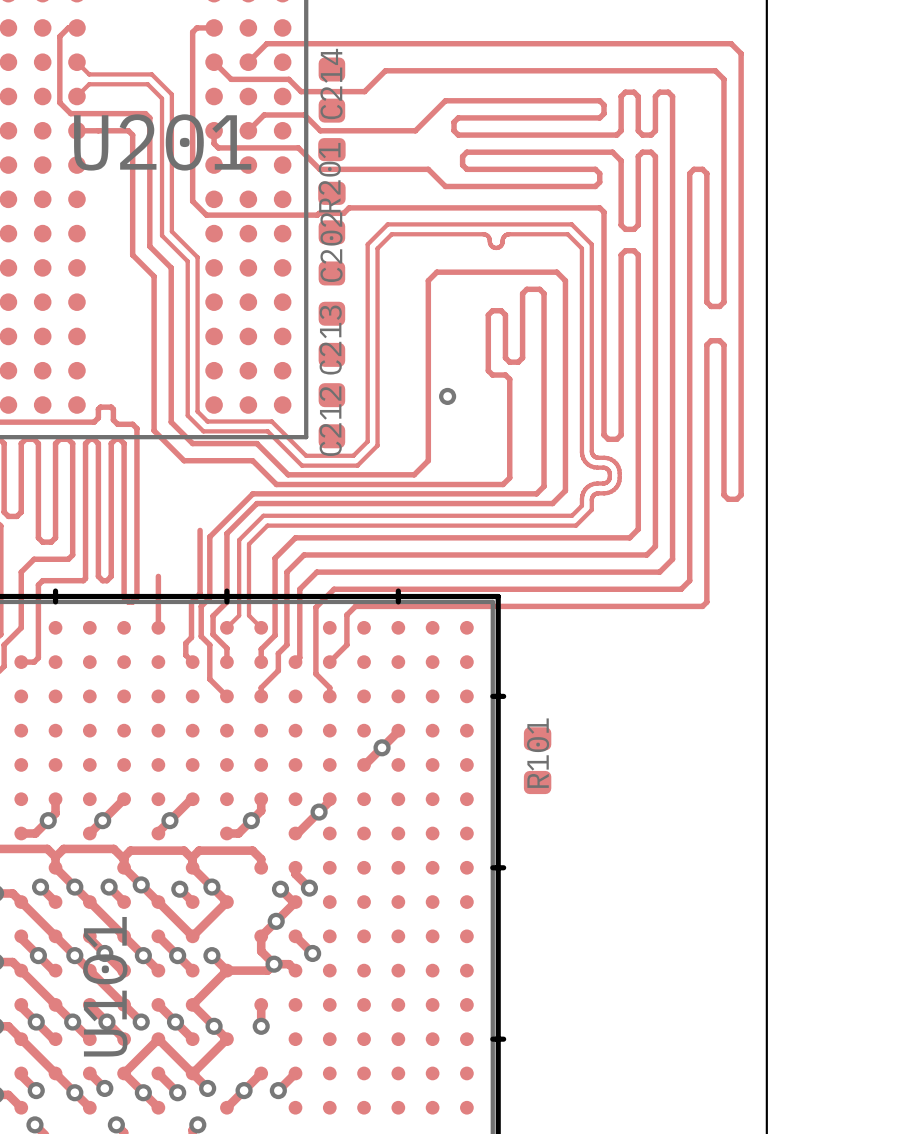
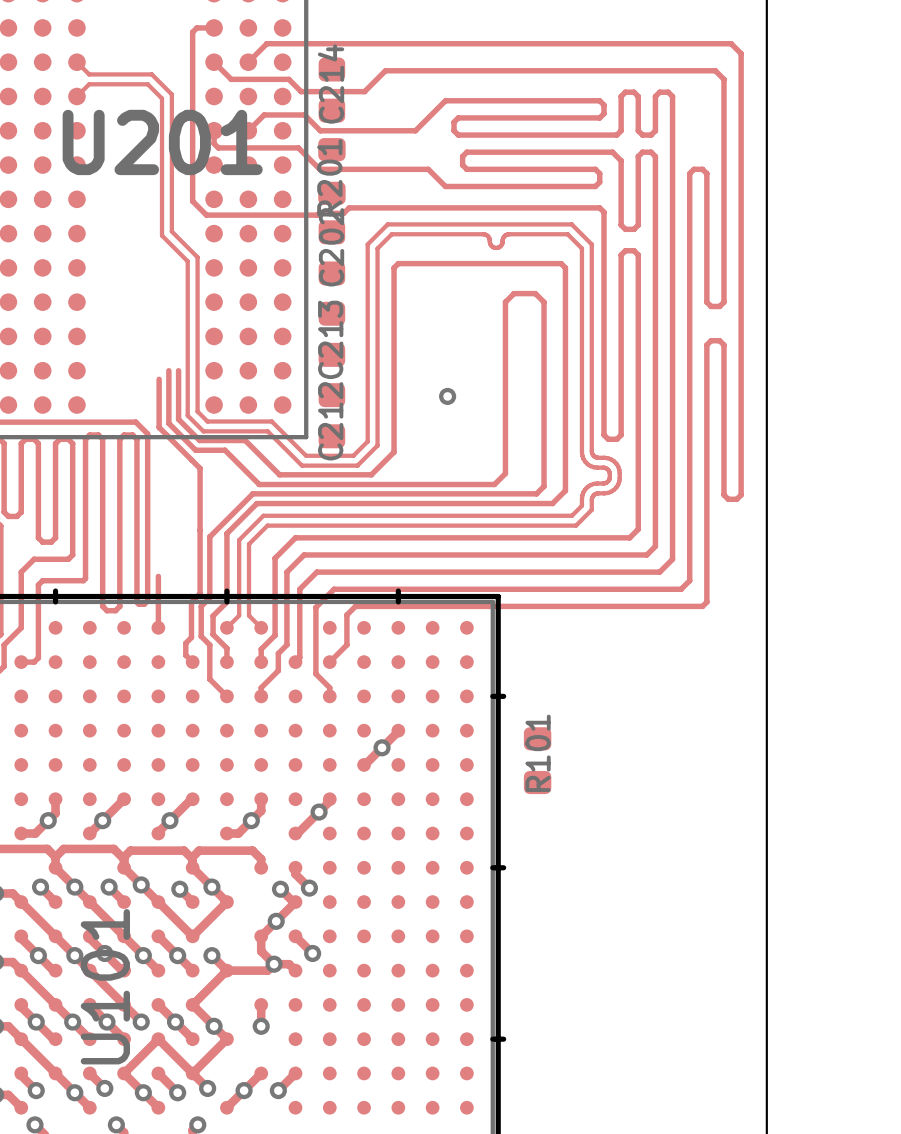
track: (76, 27) (68, 27) (59, 36) (59, 102) (70, 113) (145, 113) (149, 117) (149, 246) (171, 267) (171, 422) (192, 443) (256, 443) (288, 474) -> (178, 370) (178, 419) (199, 440) (245, 440) (279, 474) (288, 474)
track: (76, 130) (128, 130) (132, 135) (132, 255) (154, 276) (154, 430) (184, 460) (252, 460) (276, 484) -> (168, 370) (168, 423) (195, 450) (225, 450) (259, 484) (276, 484)
track: (565, 280) (556, 272) (436, 272) (428, 280) (428, 460) (414, 474) (371, 474) -> (565, 280) (565, 267) (561, 263) (398, 263) (394, 267) (394, 452) (371, 474)
track: (544, 302) (544, 293) (539, 289) (526, 289) (522, 293) (522, 357) (518, 362) (509, 362) (505, 357) -> (544, 302) (535, 293) (514, 293) (505, 302) (505, 315)
track: (505, 315) (501, 310) (492, 310) (488, 315) (488, 370) (492, 375) (505, 375) (509, 379) (509, 477) (503, 484) (494, 484) -> (505, 357) (505, 473) (494, 484)
track: none -> (159, 379) (159, 427) (200, 468) (200, 530)
track: (94, 422) (98, 417) (98, 409) (100, 407) (111, 407) (113, 409) (113, 420) (117, 424) (132, 424) (136, 428) (136, 439) -> (85, 443) (85, 439) (89, 435) (98, 435) (102, 439) (102, 606) (106, 610) (115, 610) (119, 606) (119, 439) (124, 435) (132, 435) (136, 439)
track: (85, 443) (89, 439) (94, 439) (98, 443) (98, 576) (102, 580) (106, 580) (111, 576) (111, 443) (115, 439) (119, 439) (124, 443) (124, 597) (128, 602) (132, 602) (136, 597) -> (94, 422) (135, 422) (147, 433) (147, 600) (144, 604) (139, 604) (136, 597)

